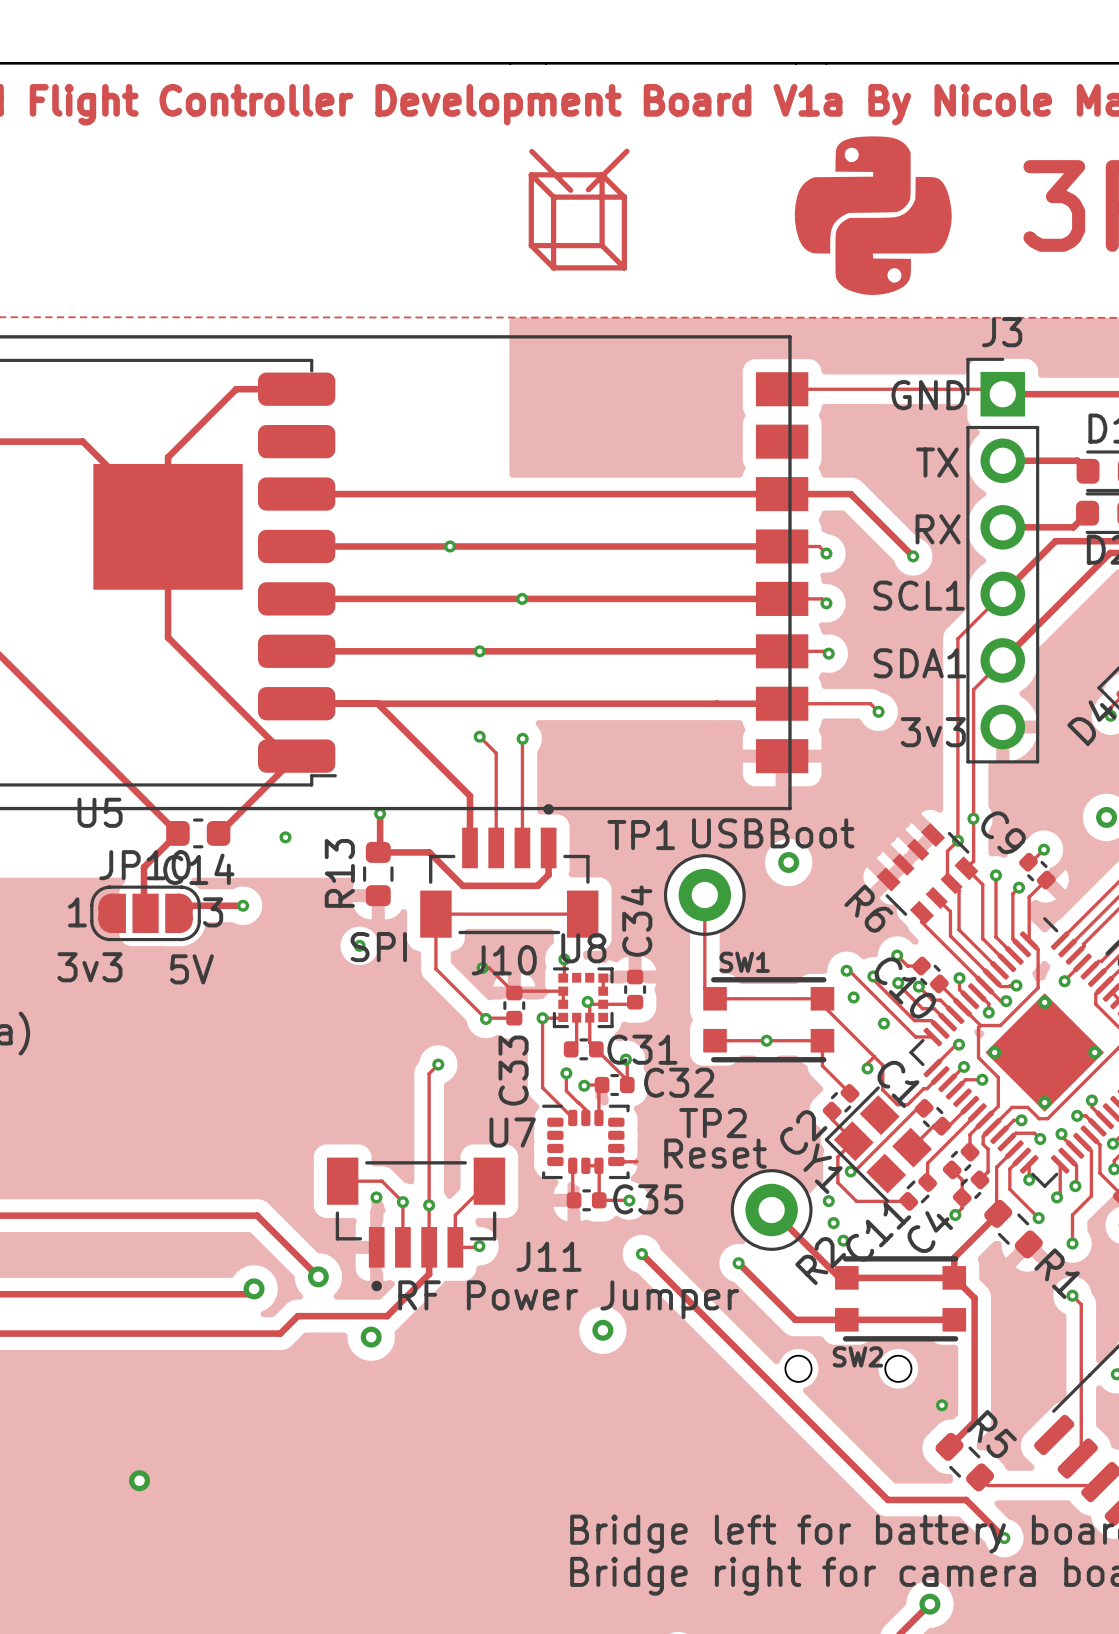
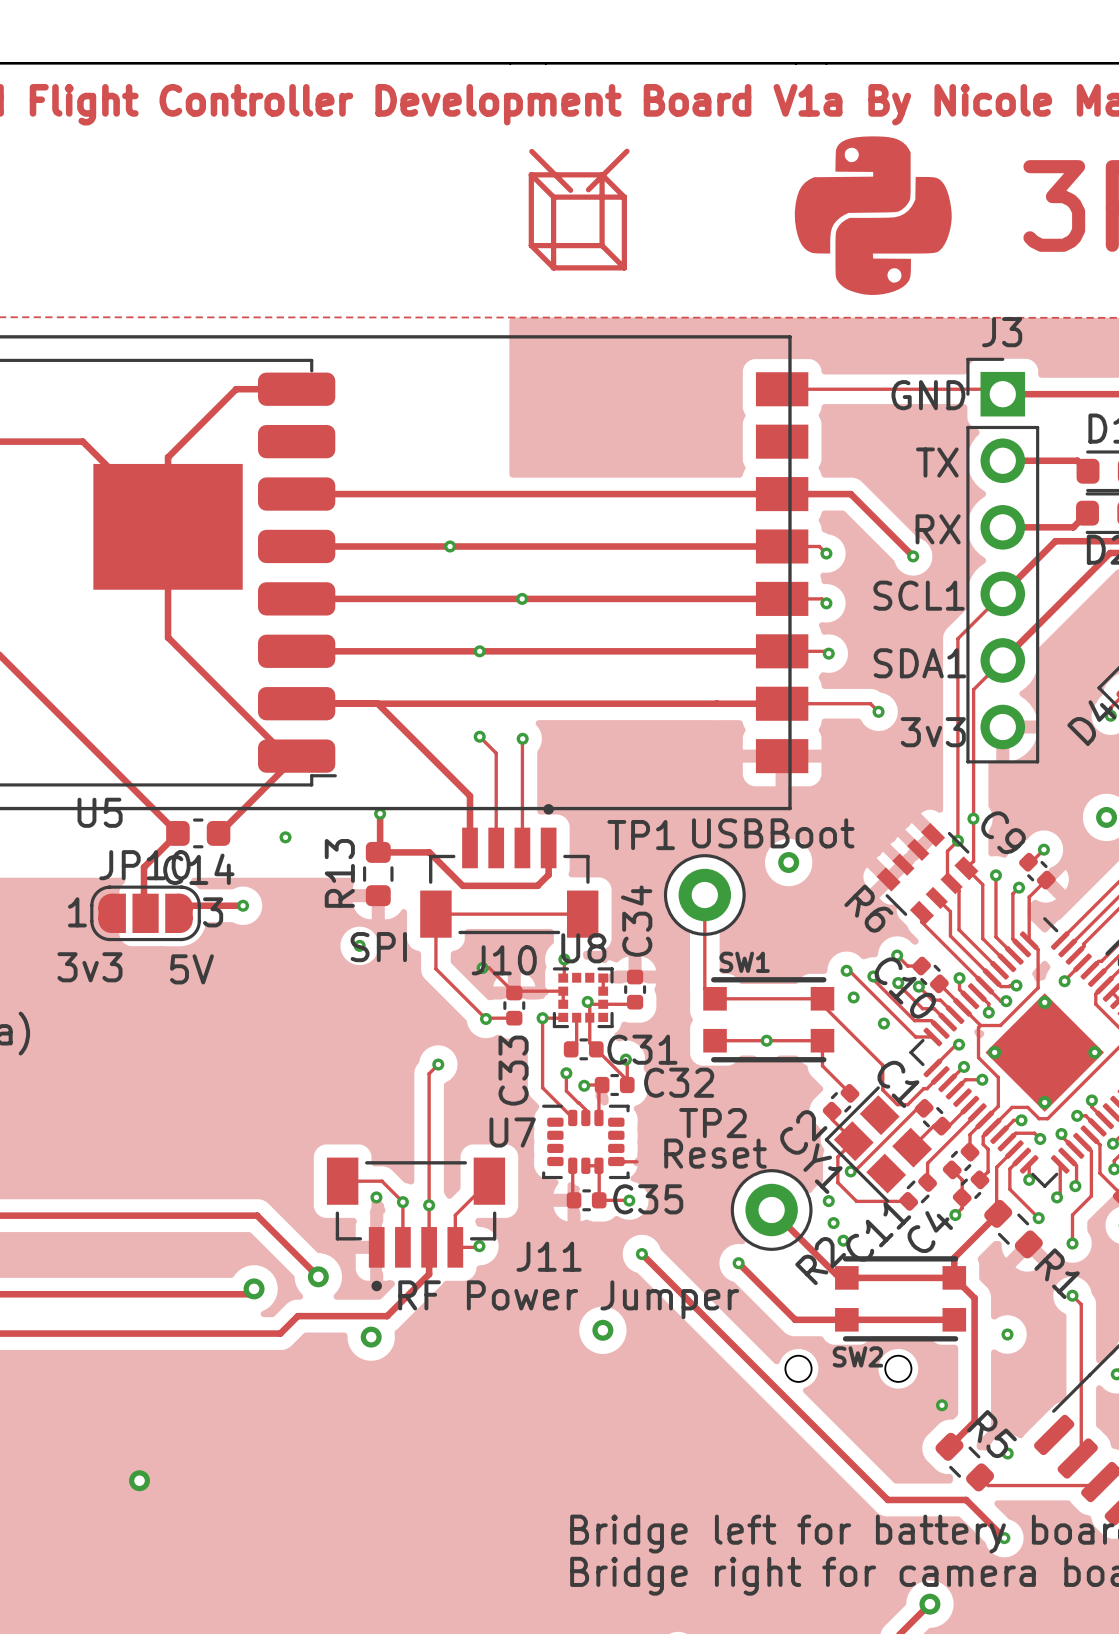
track: (874, 1056) (867, 1063) (867, 1068) -> none
via: (867, 1068) -> none
via: none -> (1007, 1334)
via: none -> (1007, 1453)

